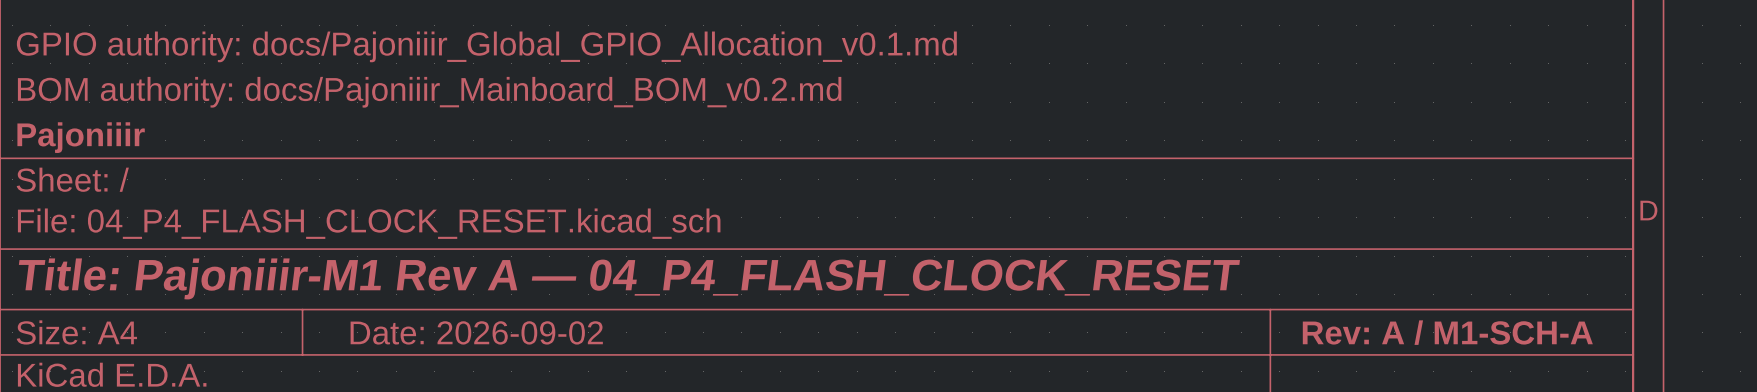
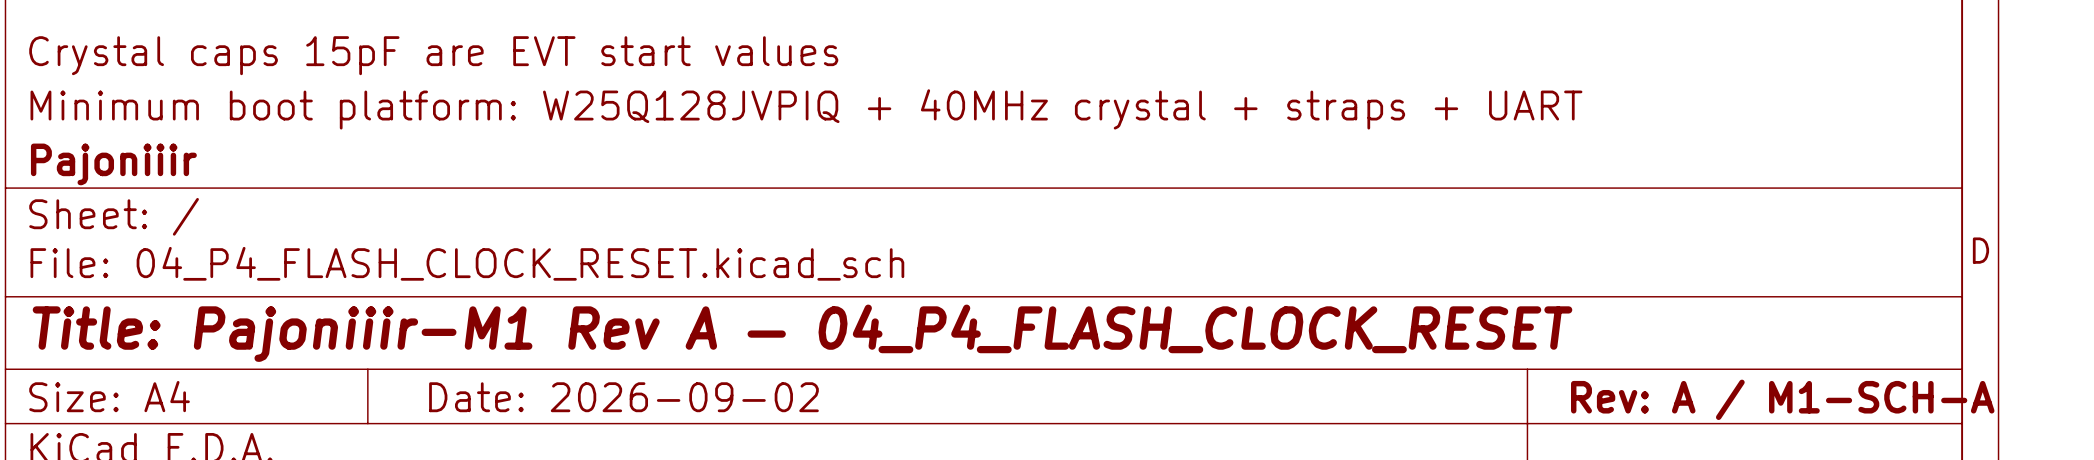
title block: GPIO authority: docs/Pajoniiir_Global_GPIO_Allocation_v0.1.md (486, 46) -> Crystal caps 15pF are EVT start values (433, 55)
title block: BOM authority: docs/Pajoniiir_Mainboard_BOM_v0.2.md (429, 92) -> Minimum boot platform: W25Q128JVPIQ + 40MHz crystal + straps + UART (806, 109)

